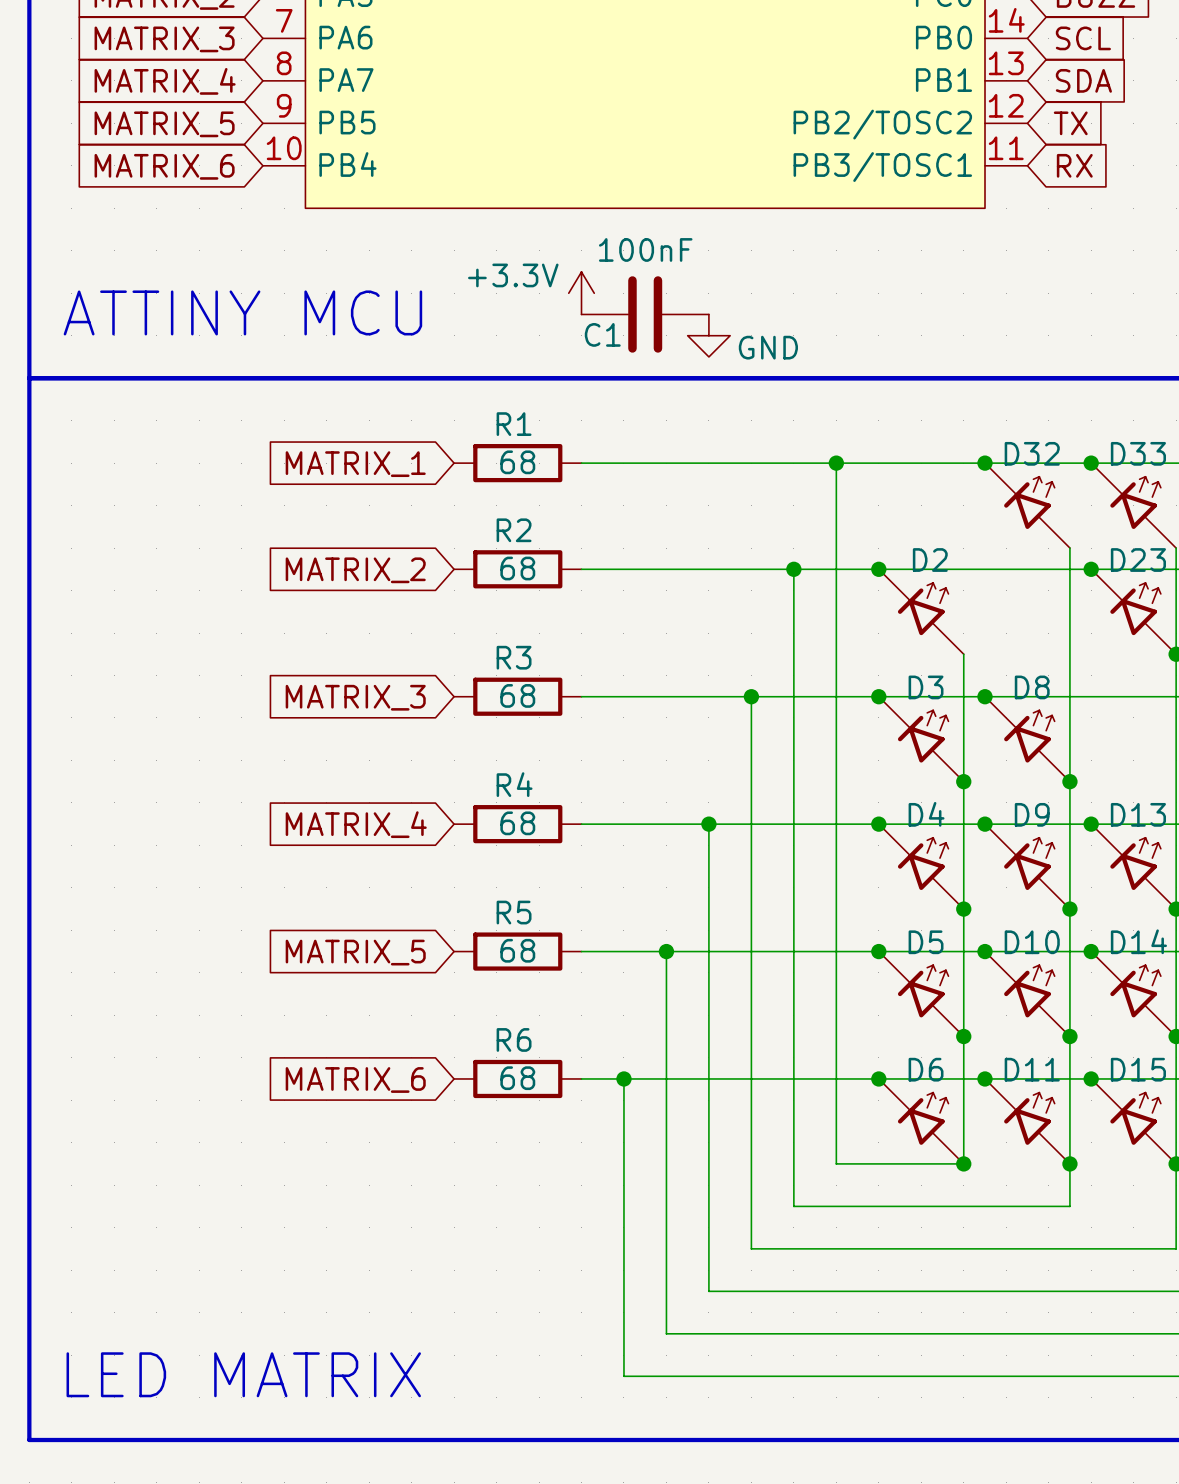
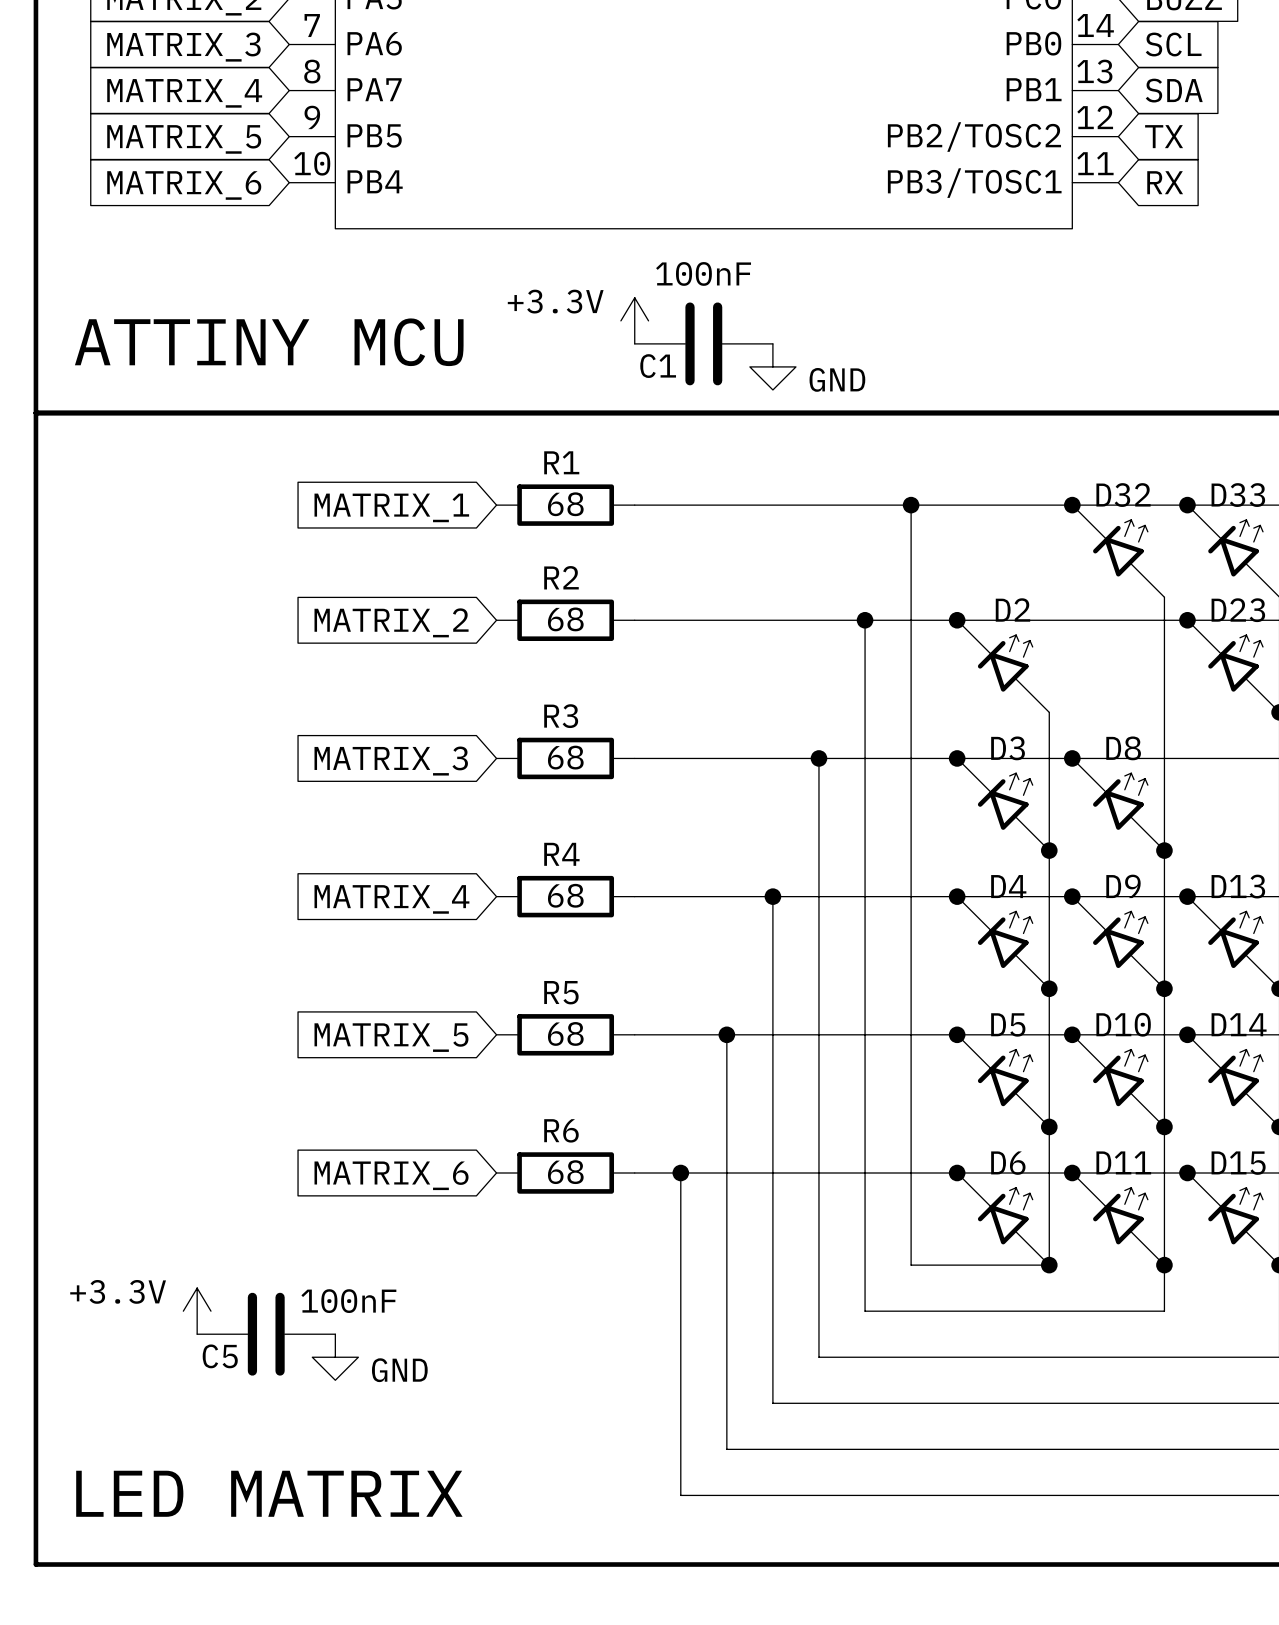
power symbol: none -> +3.3V (197, 1311)
C5: none -> 100nF (266, 1334)
power symbol: none -> GND (335, 1357)

